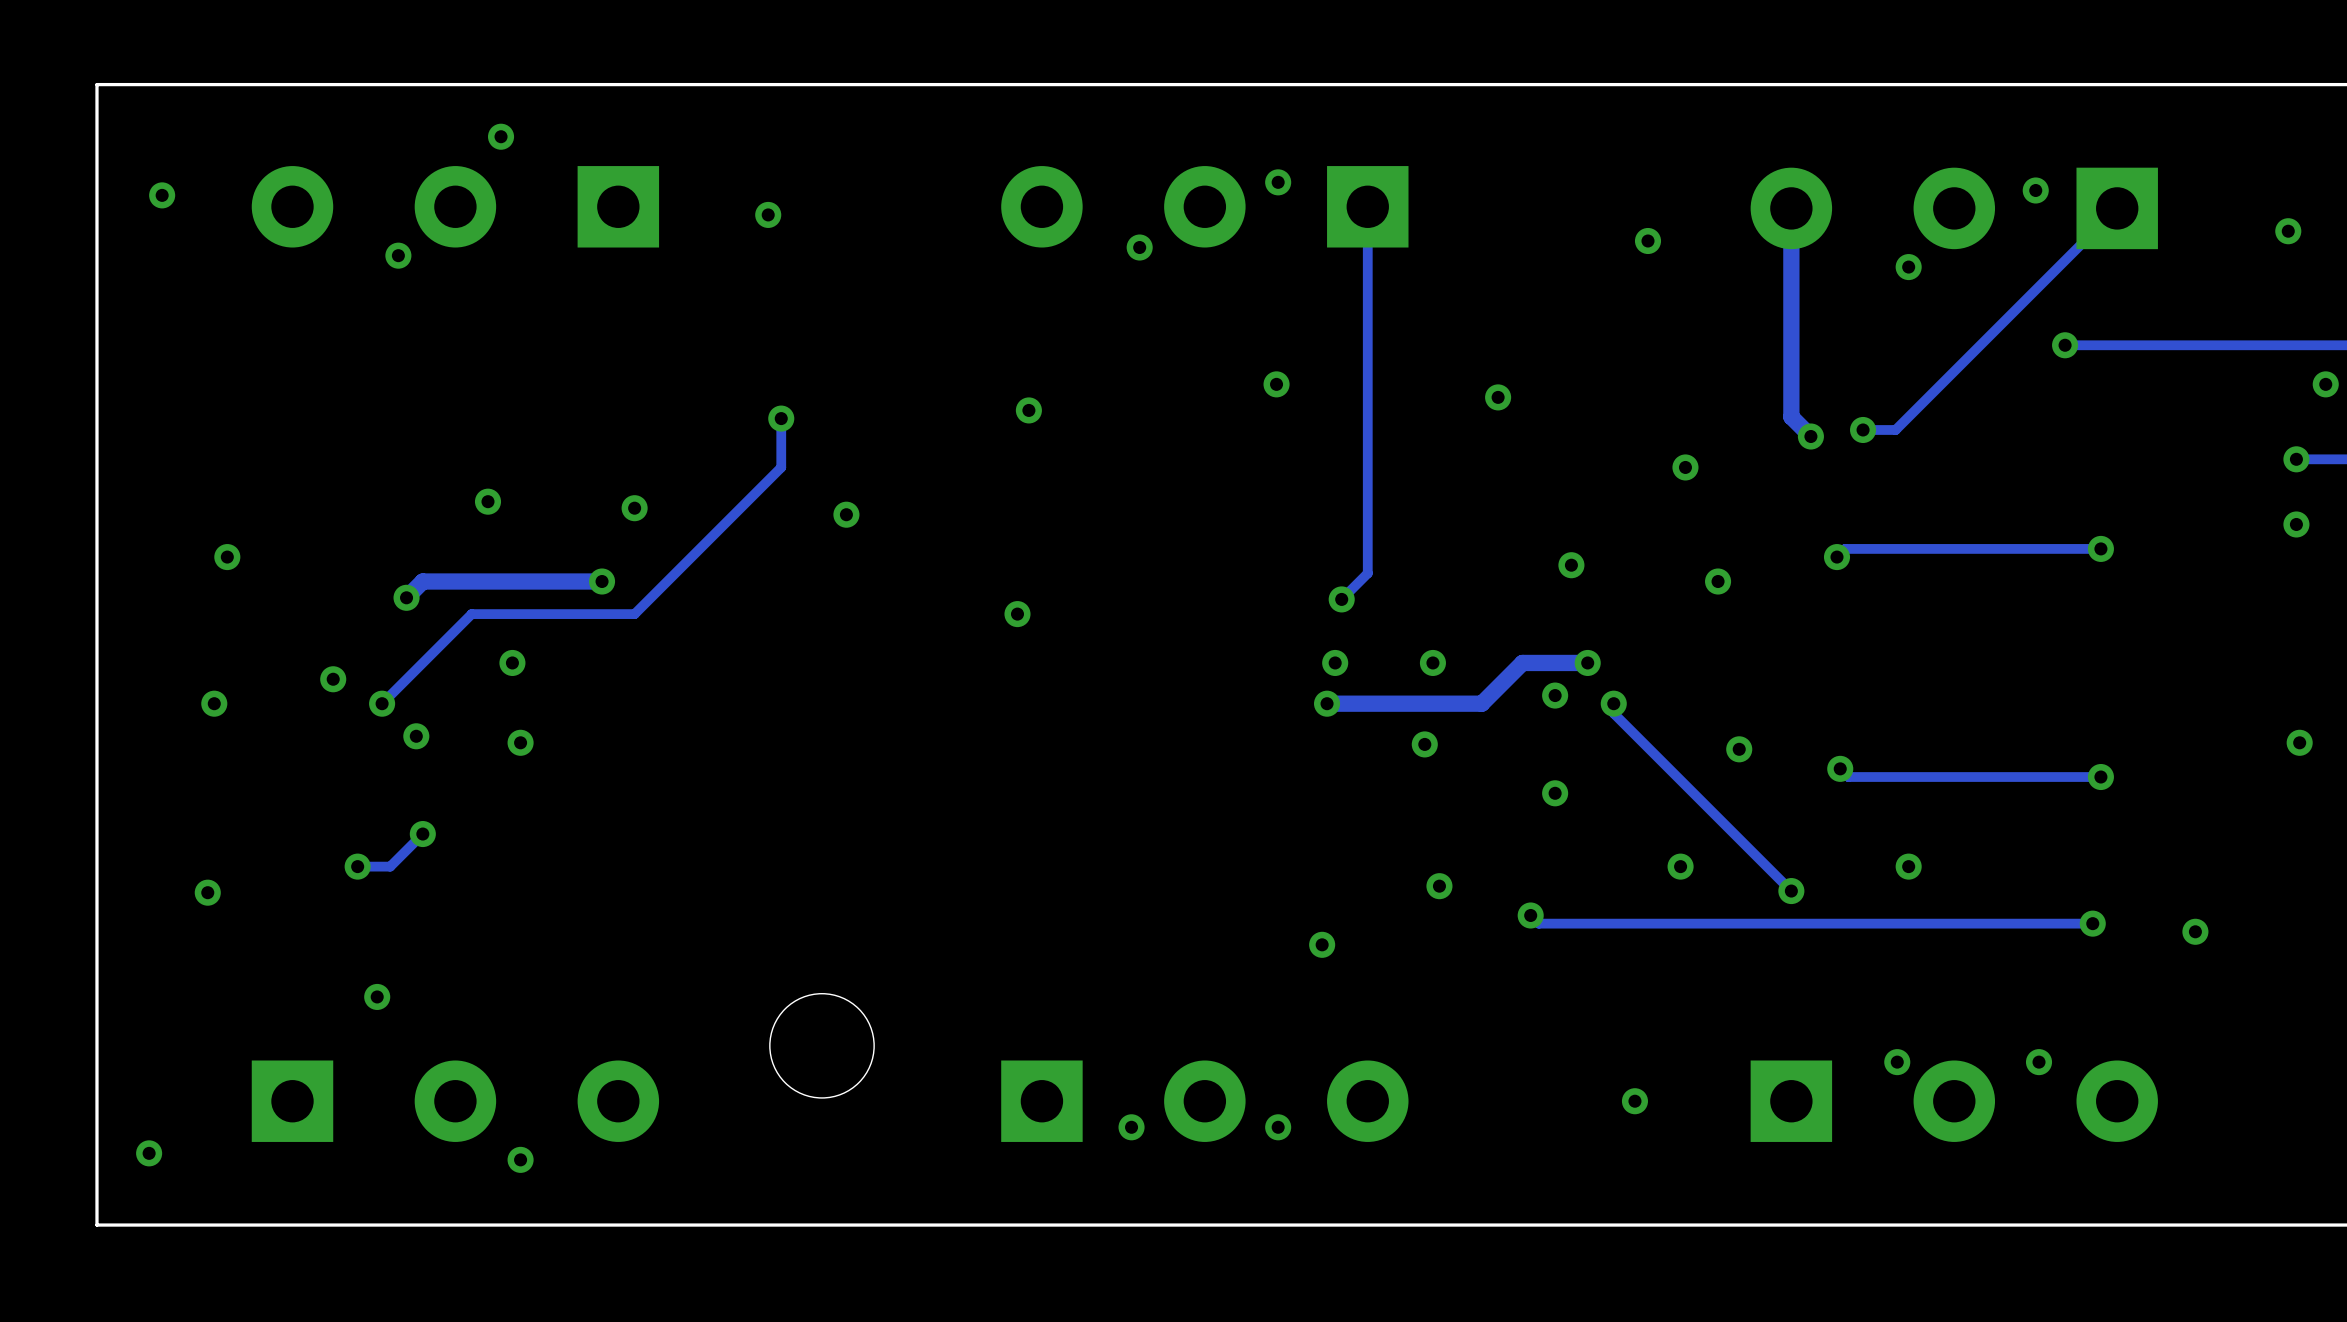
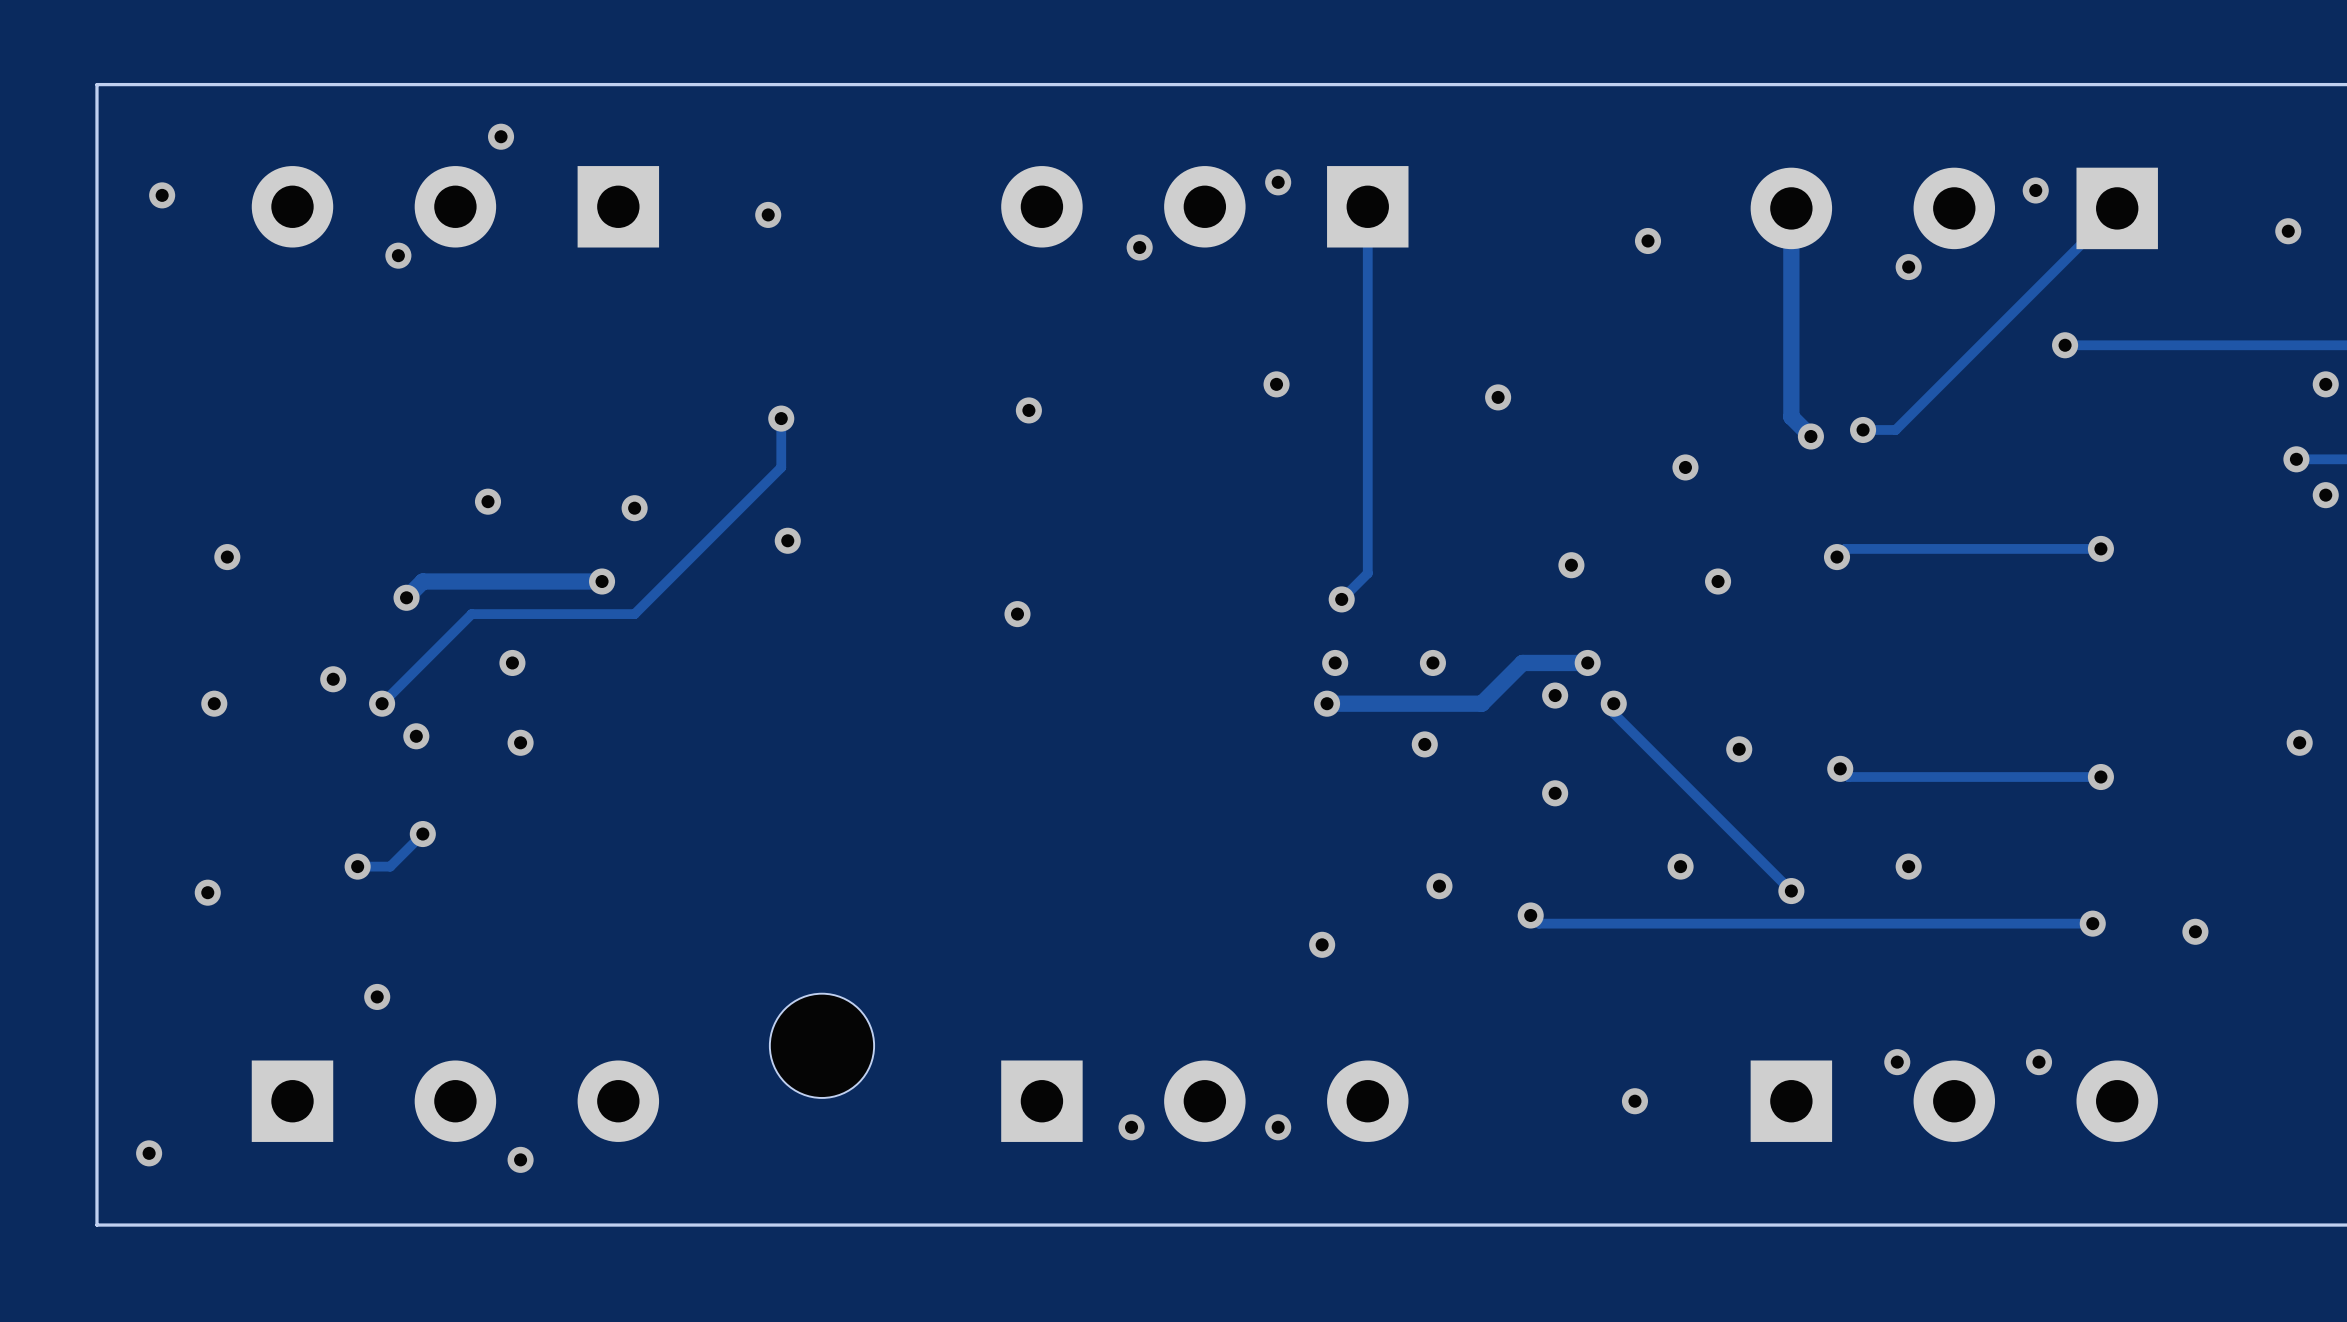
via position: (846, 514) -> (787, 540)
via position: (2296, 524) -> (2325, 495)

